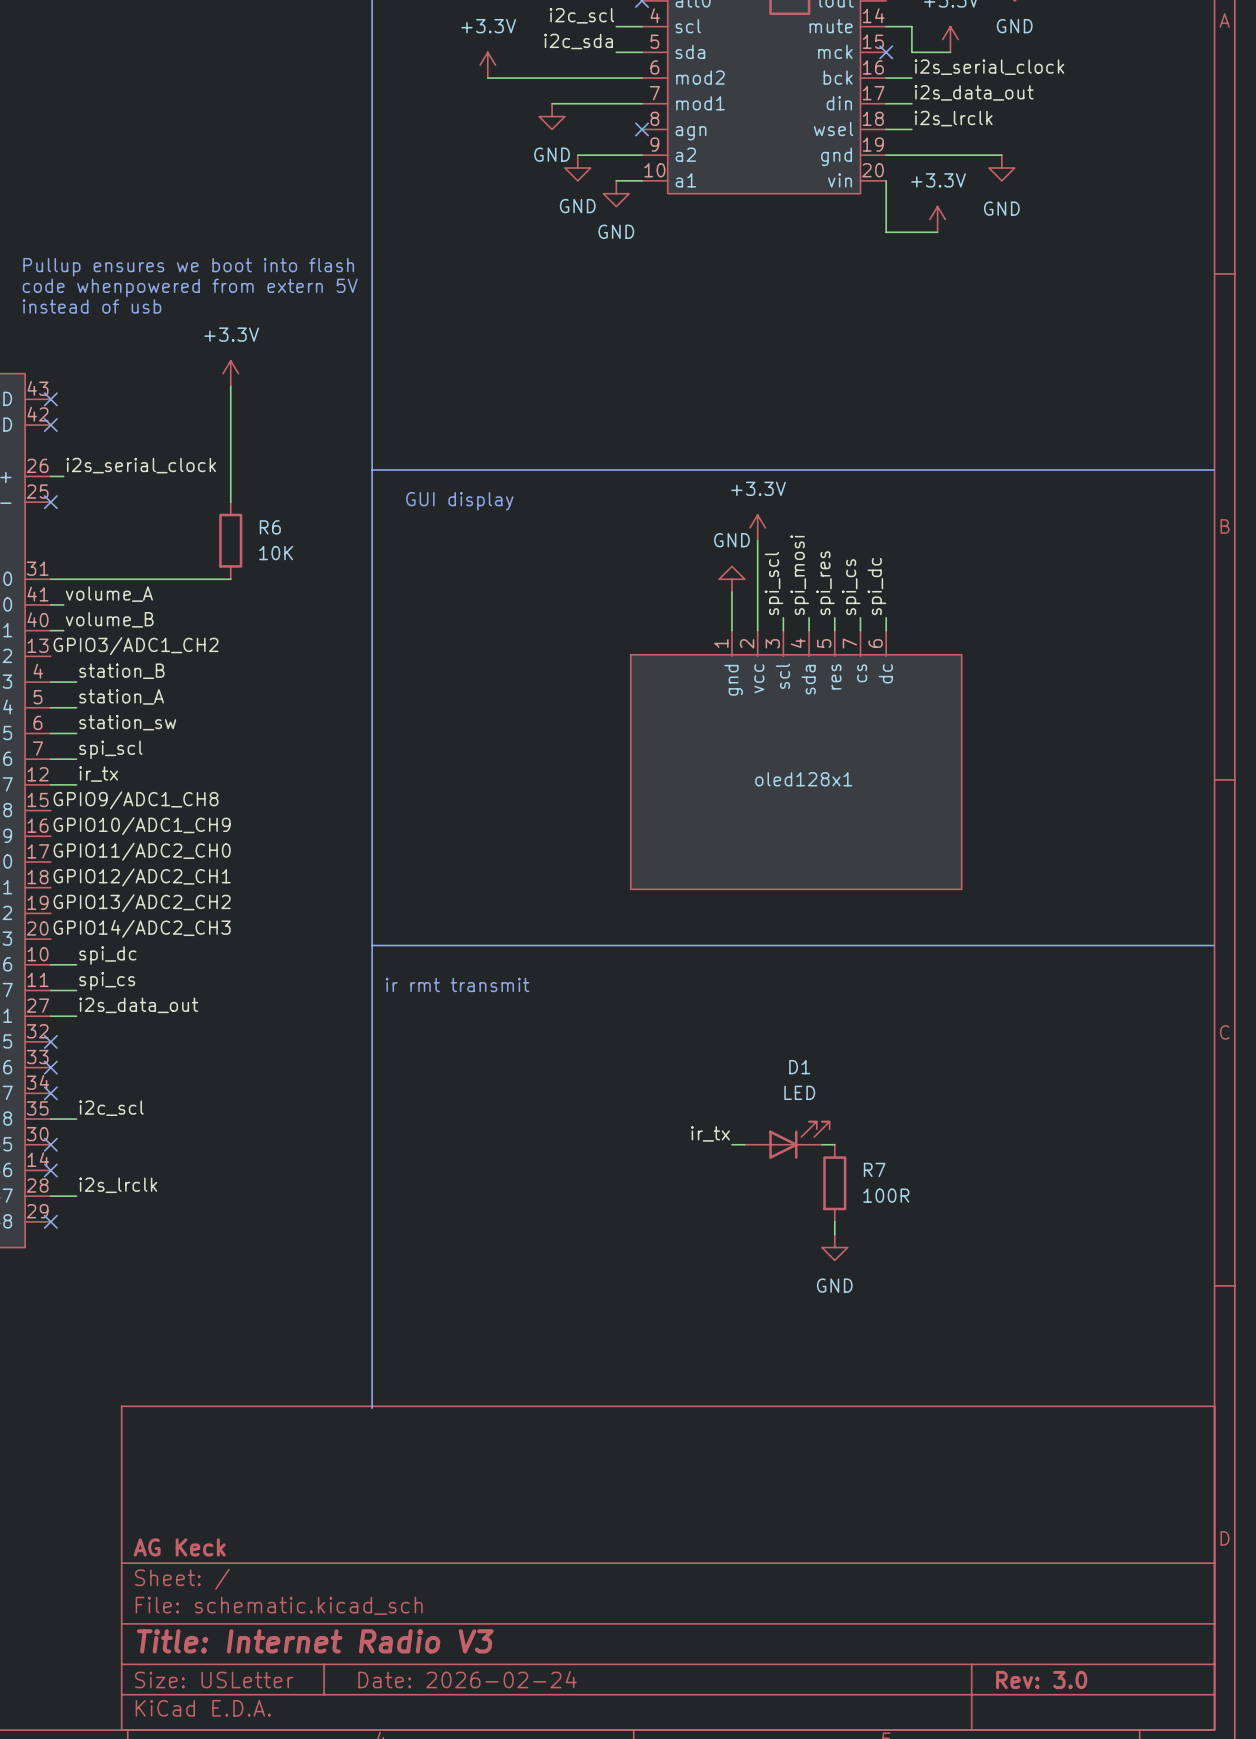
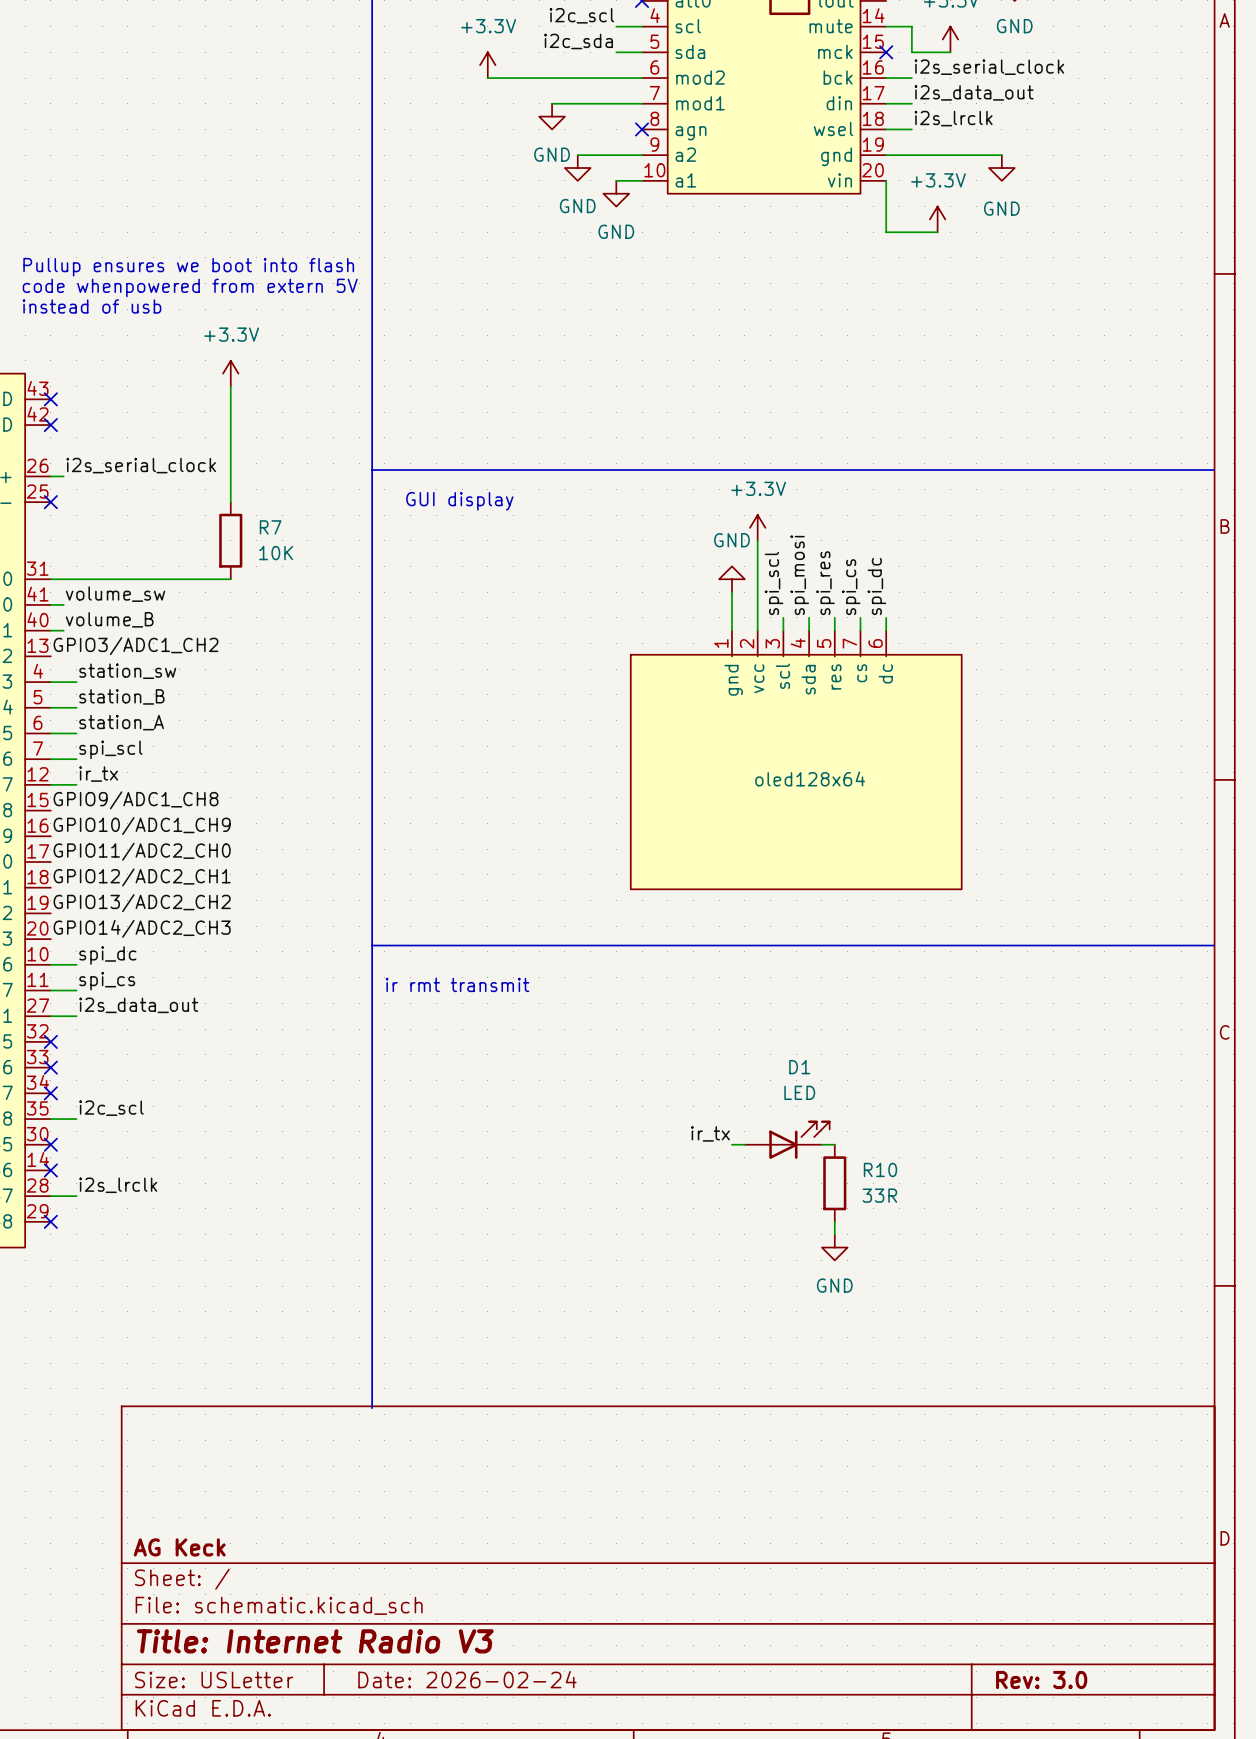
R6 name: R6 (270, 527) -> R7 (270, 527)
label: volume_A (109, 594) -> volume_sw (115, 594)
label: station_B (121, 671) -> station_sw (127, 671)
label: station_A (121, 696) -> station_B (121, 696)
label: station_sw (127, 722) -> station_A (121, 722)
oled128x1 name: oled128x1 (803, 779) -> oled128x64 (810, 778)
R7 name: R7 (874, 1169) -> R10 (880, 1169)
R7 value: 100R (886, 1195) -> 33R (879, 1195)

